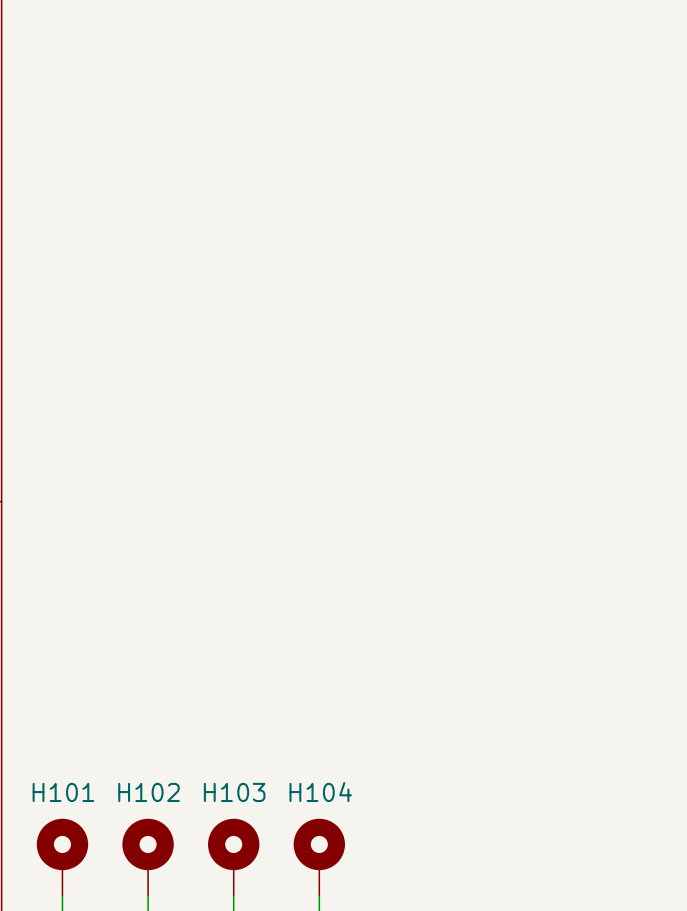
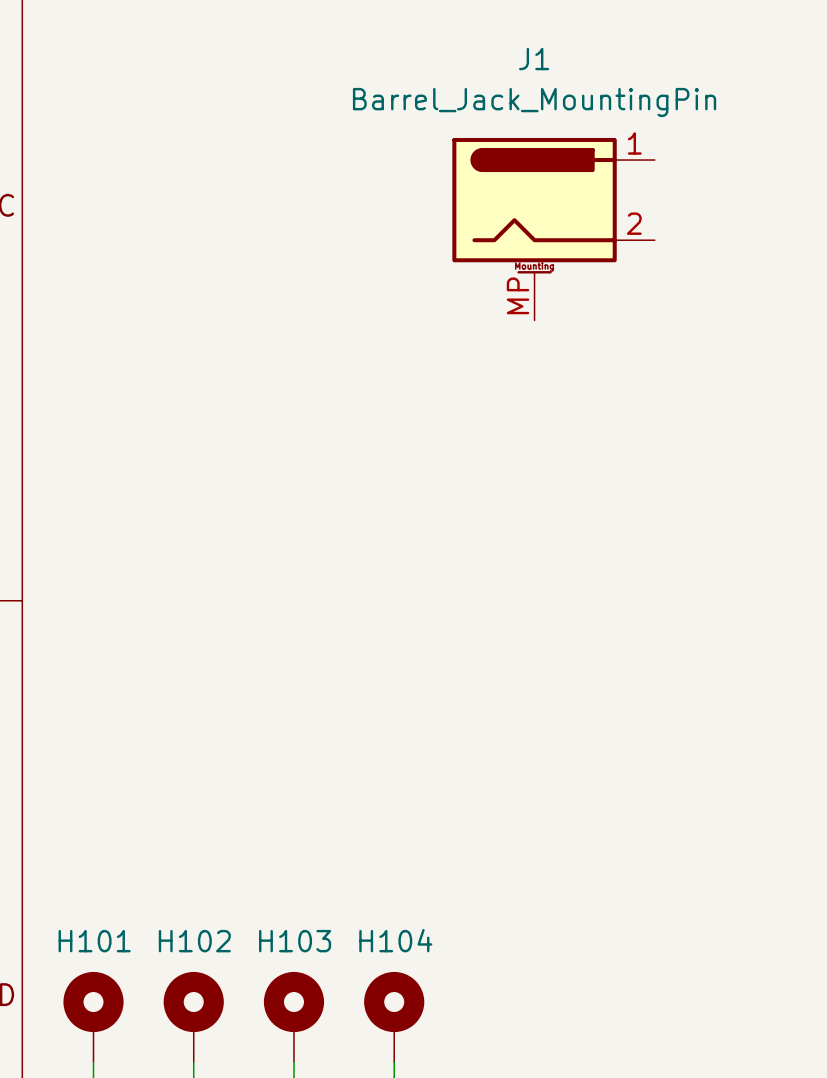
J1: none -> Barrel_Jack_MountingPin (553, 229)

